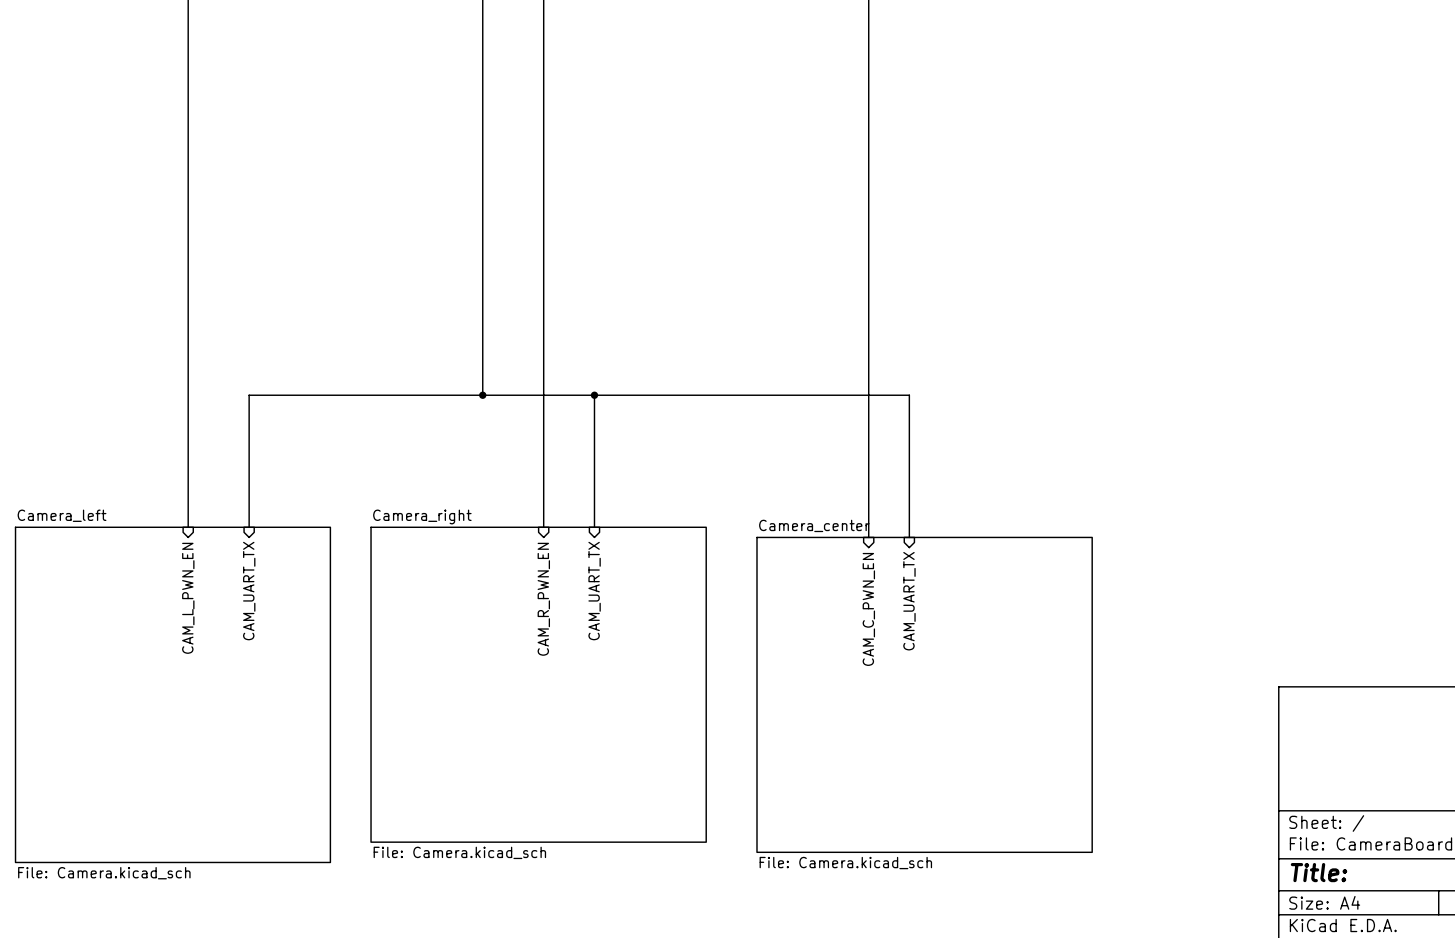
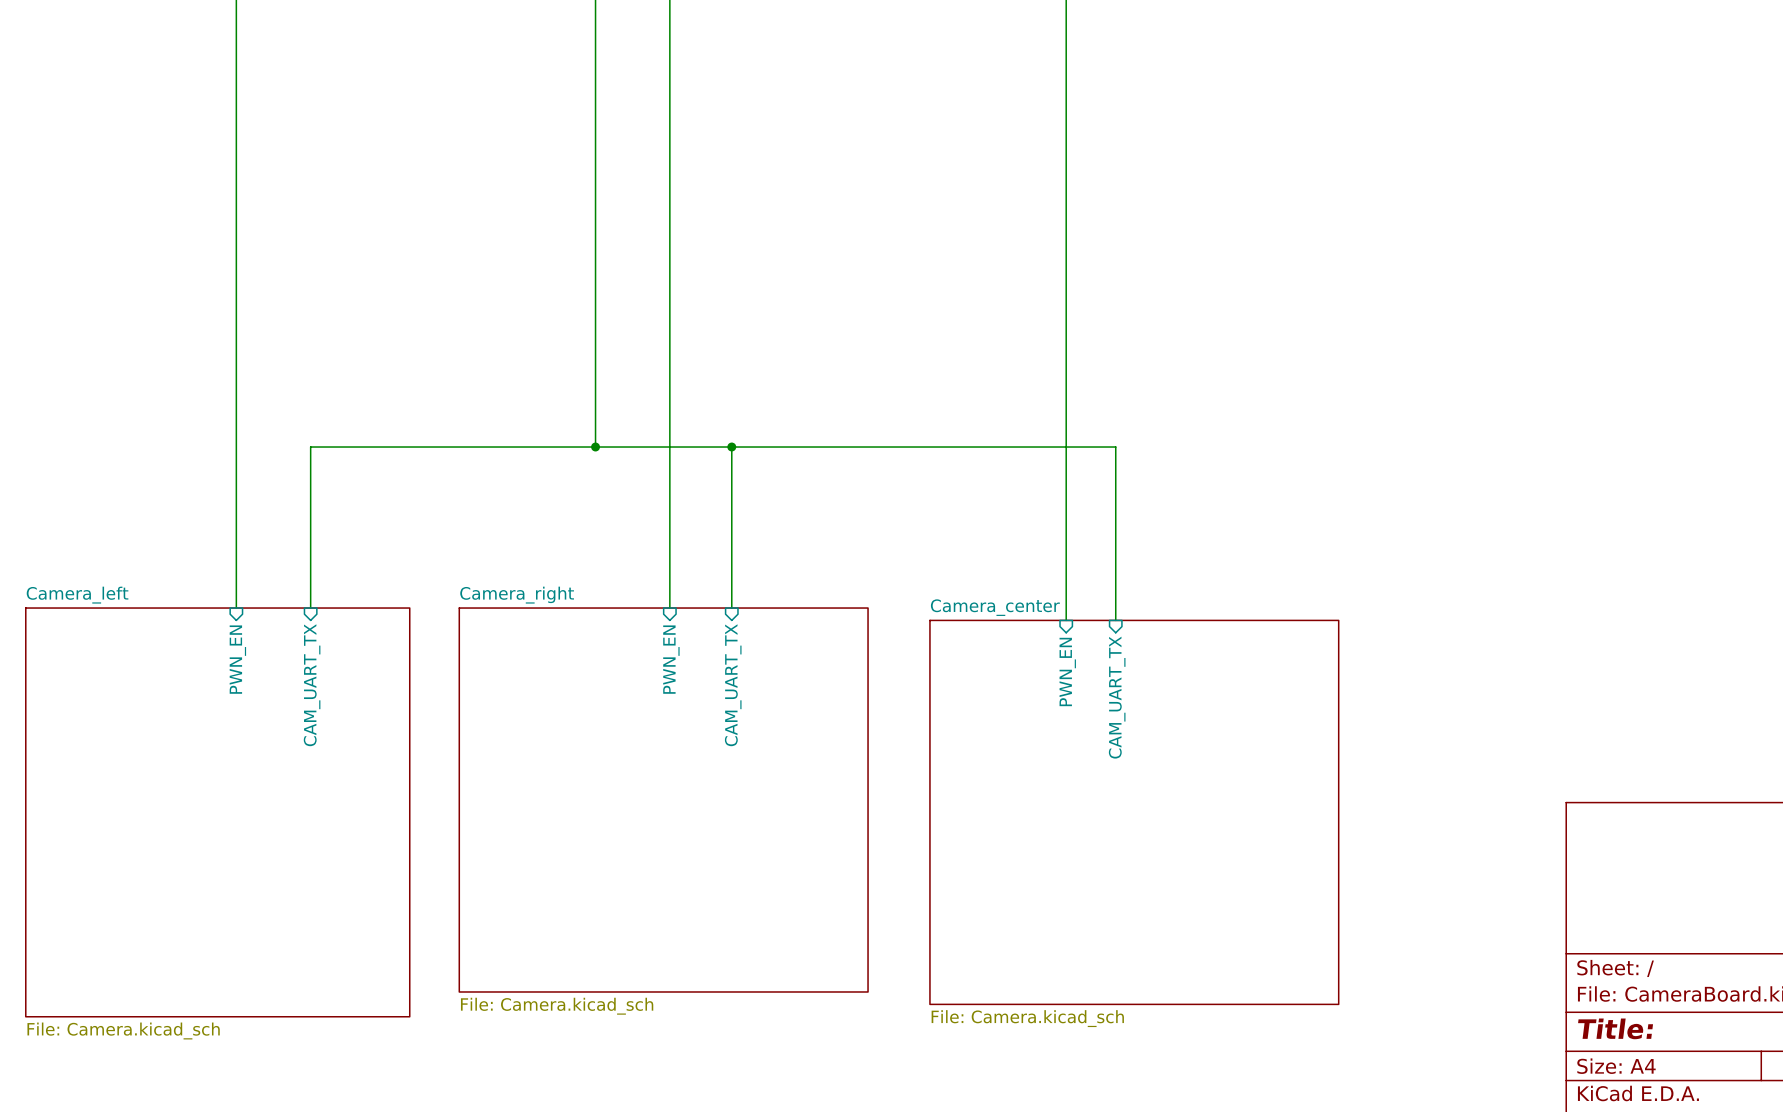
sheet pin: CAM_L_PWN_EN (188, 598) -> PWN_EN (237, 659)
sheet pin: CAM_R_PWN_EN (543, 599) -> PWN_EN (671, 659)
sheet pin: CAM_C_PWN_EN (868, 609) -> PWN_EN (1067, 671)

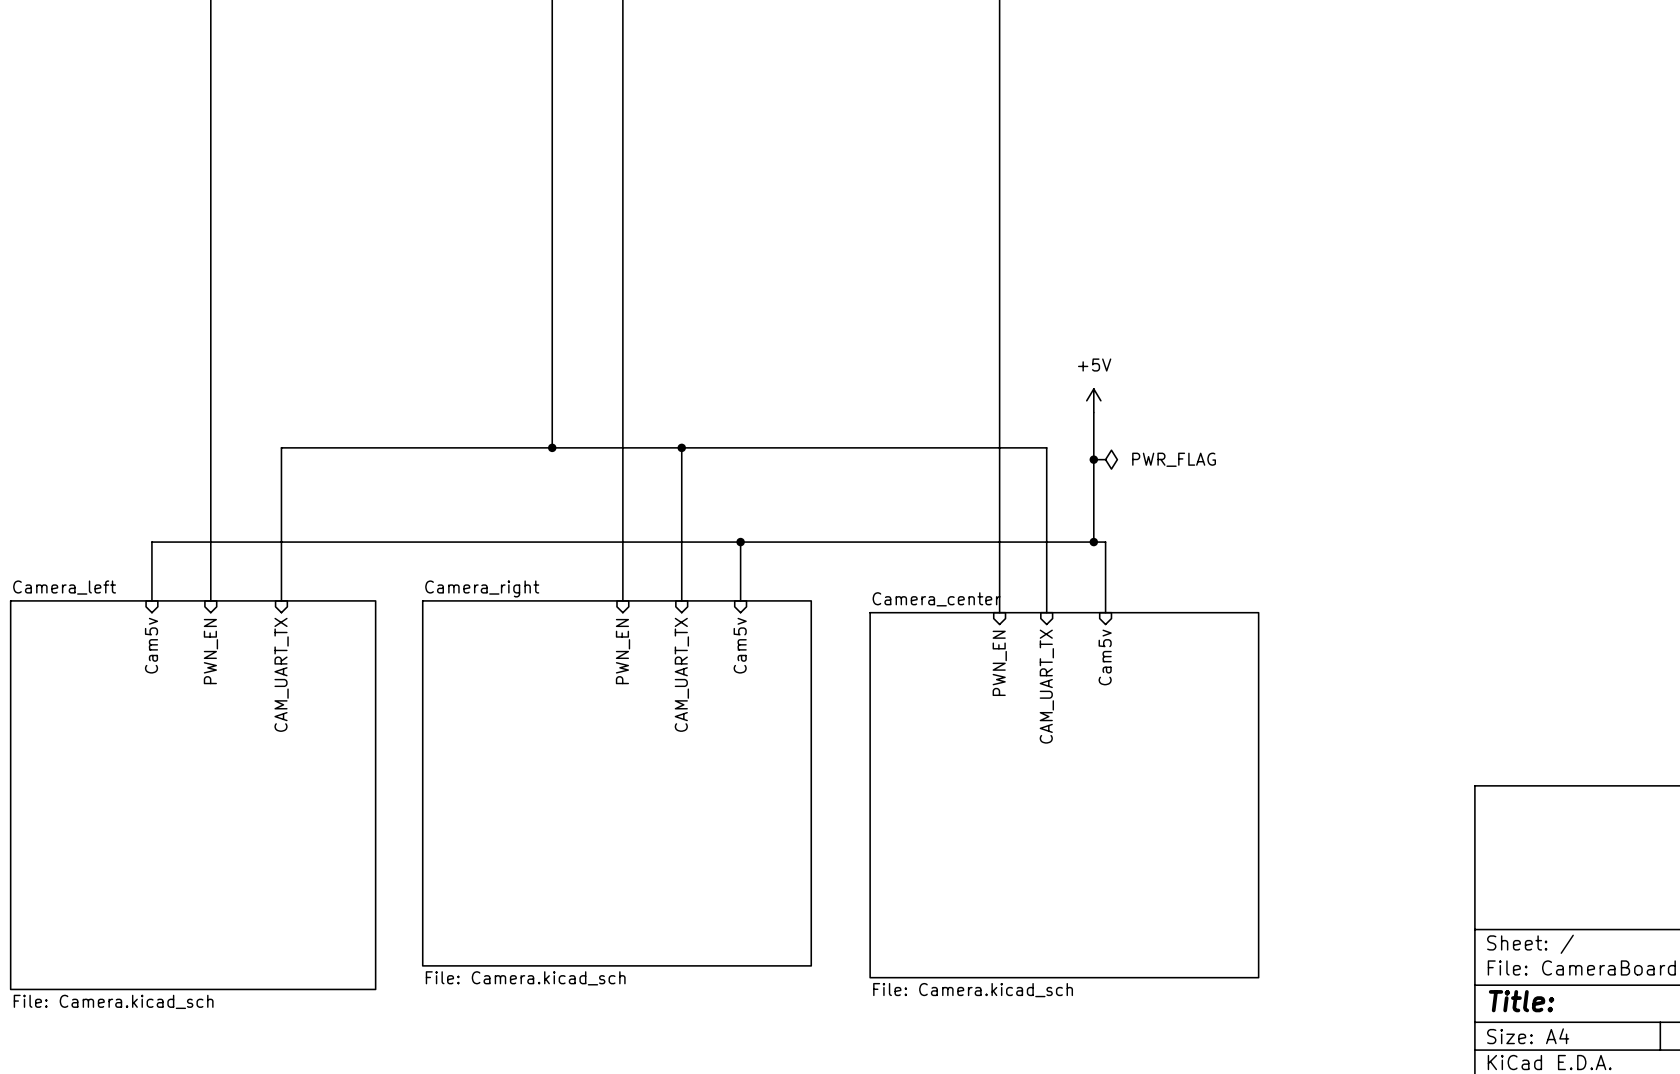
power symbol: none -> +5V (1093, 400)
wire: none -> (1093, 412) (1093, 542)
junction: none -> (1093, 459)
power symbol: none -> PWR_FLAG (1105, 459)
wire: none -> (740, 542) (740, 600)
junction: none -> (740, 542)
junction: none -> (1093, 542)
wire: none -> (151, 600) (151, 542) (1105, 542) (1105, 612)
sheet pin: none -> Cam5v (151, 645)
sheet pin: none -> Cam5v (740, 645)
sheet pin: none -> Cam5v (1105, 657)

